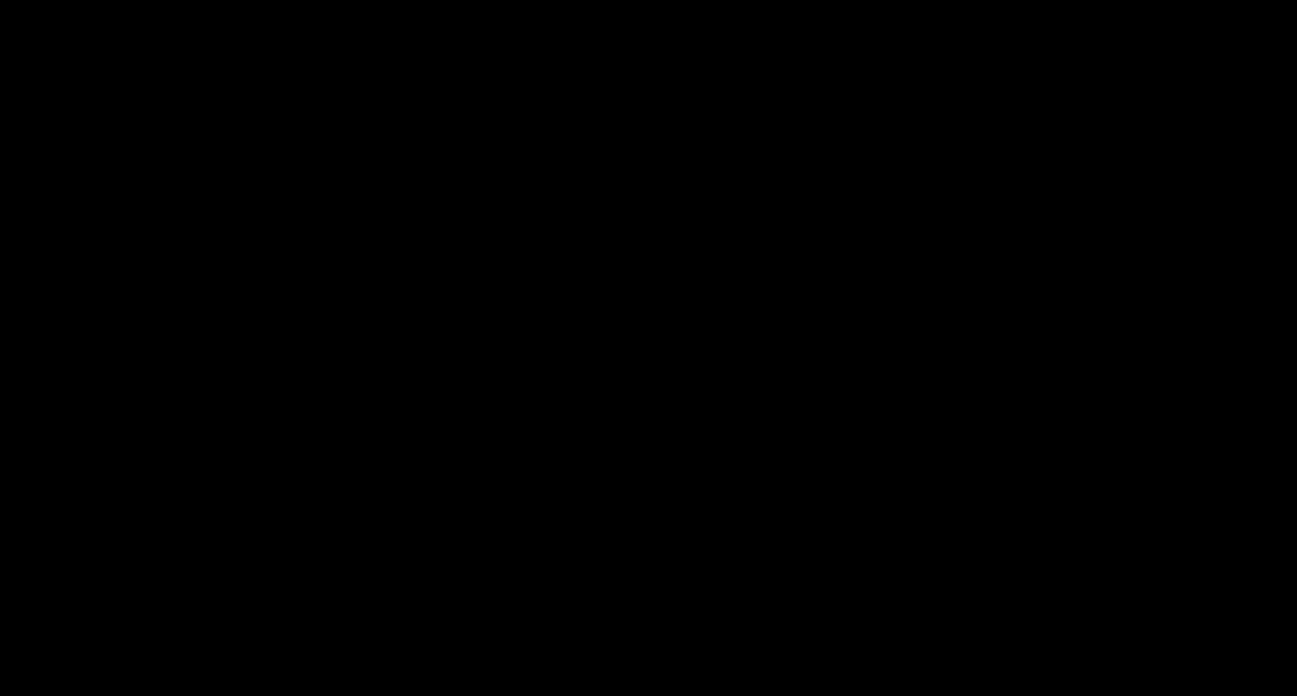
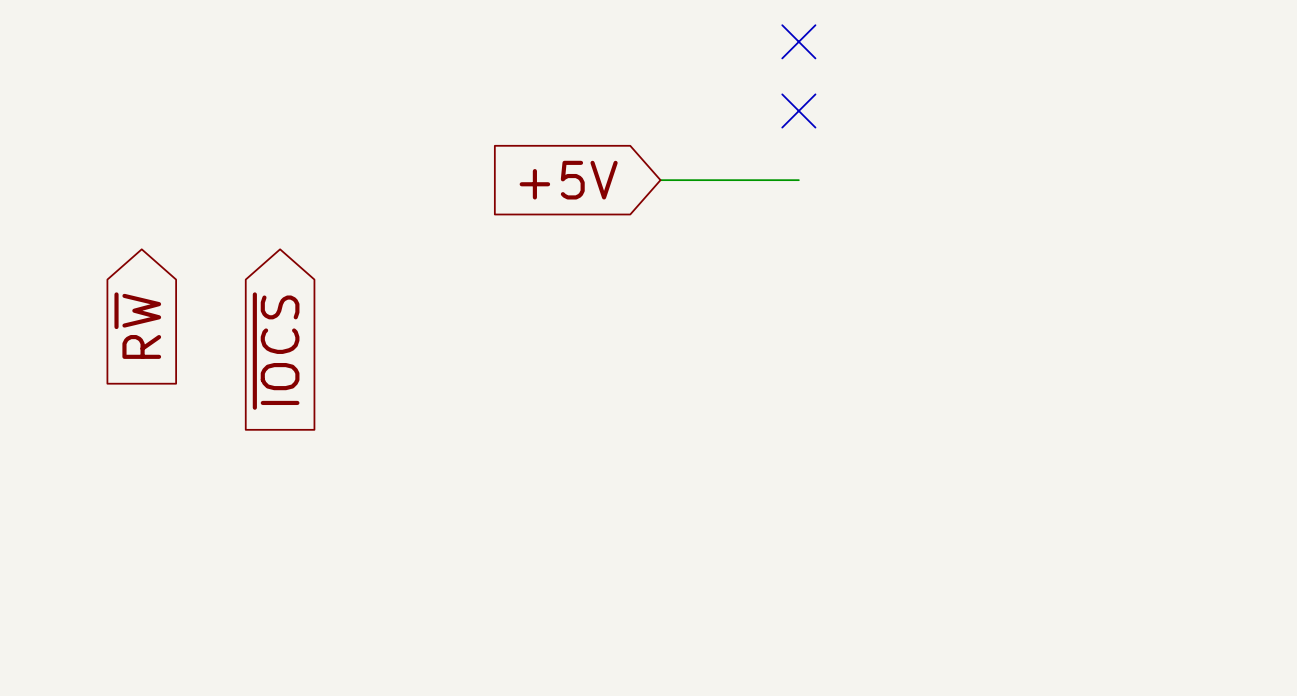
no-connect mark: none -> (798, 41)
no-connect mark: none -> (798, 110)
global label: none -> +5V (568, 180)
wire: none -> (660, 180) (798, 180)
global label: none -> R~{W} (137, 325)
global label: none -> ~{IOCS} (276, 351)

